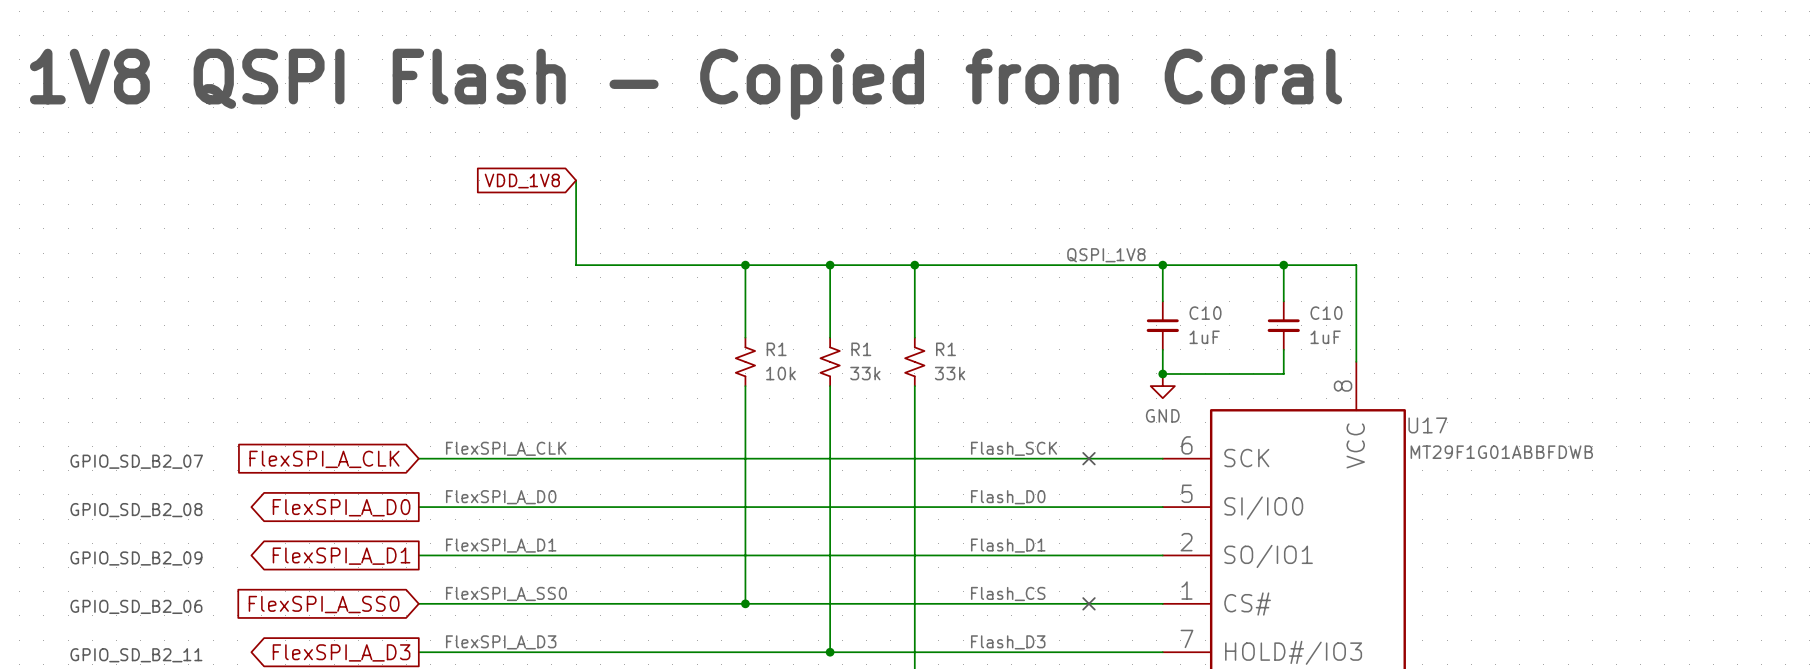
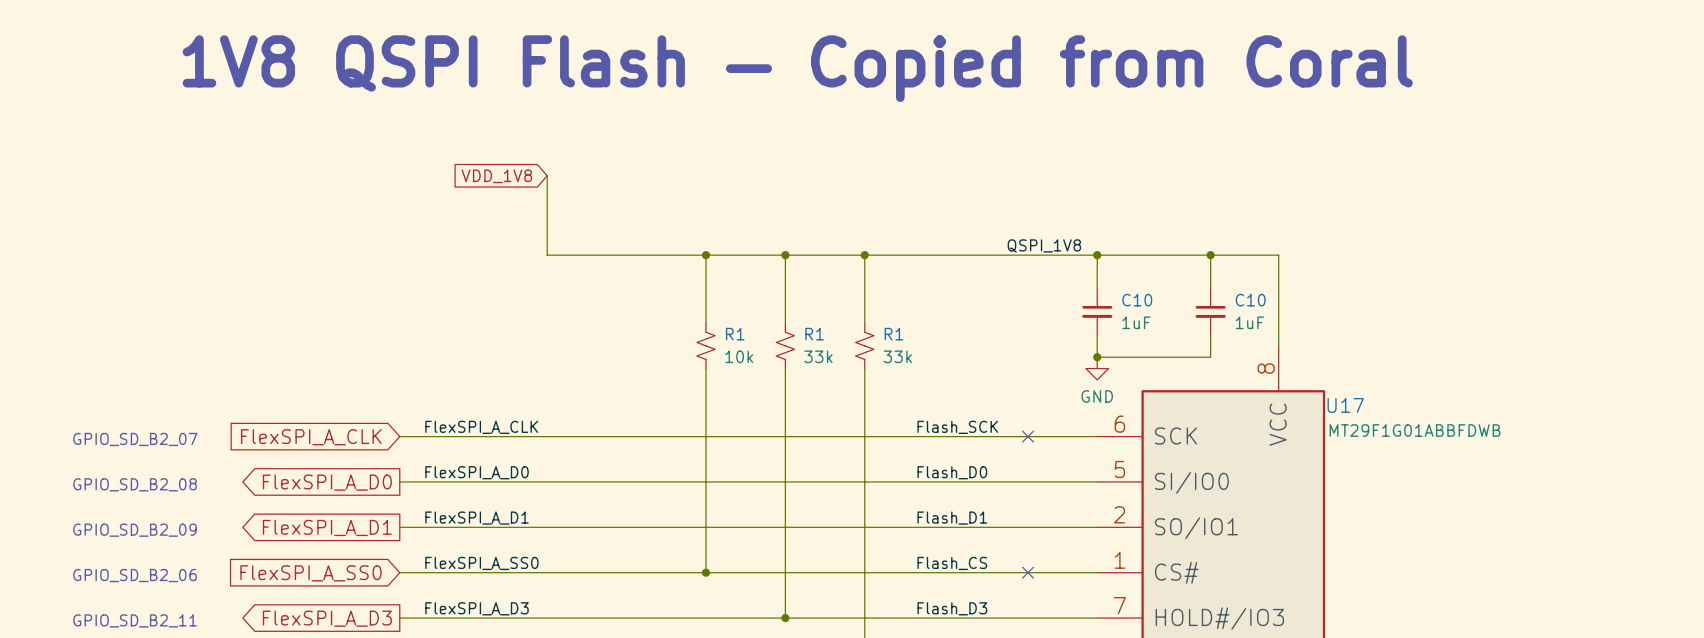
text position: 1V8 QSPI Flash — Copied from Coral (686, 84) -> 1V8 QSPI Flash — Copied from Coral (797, 68)

